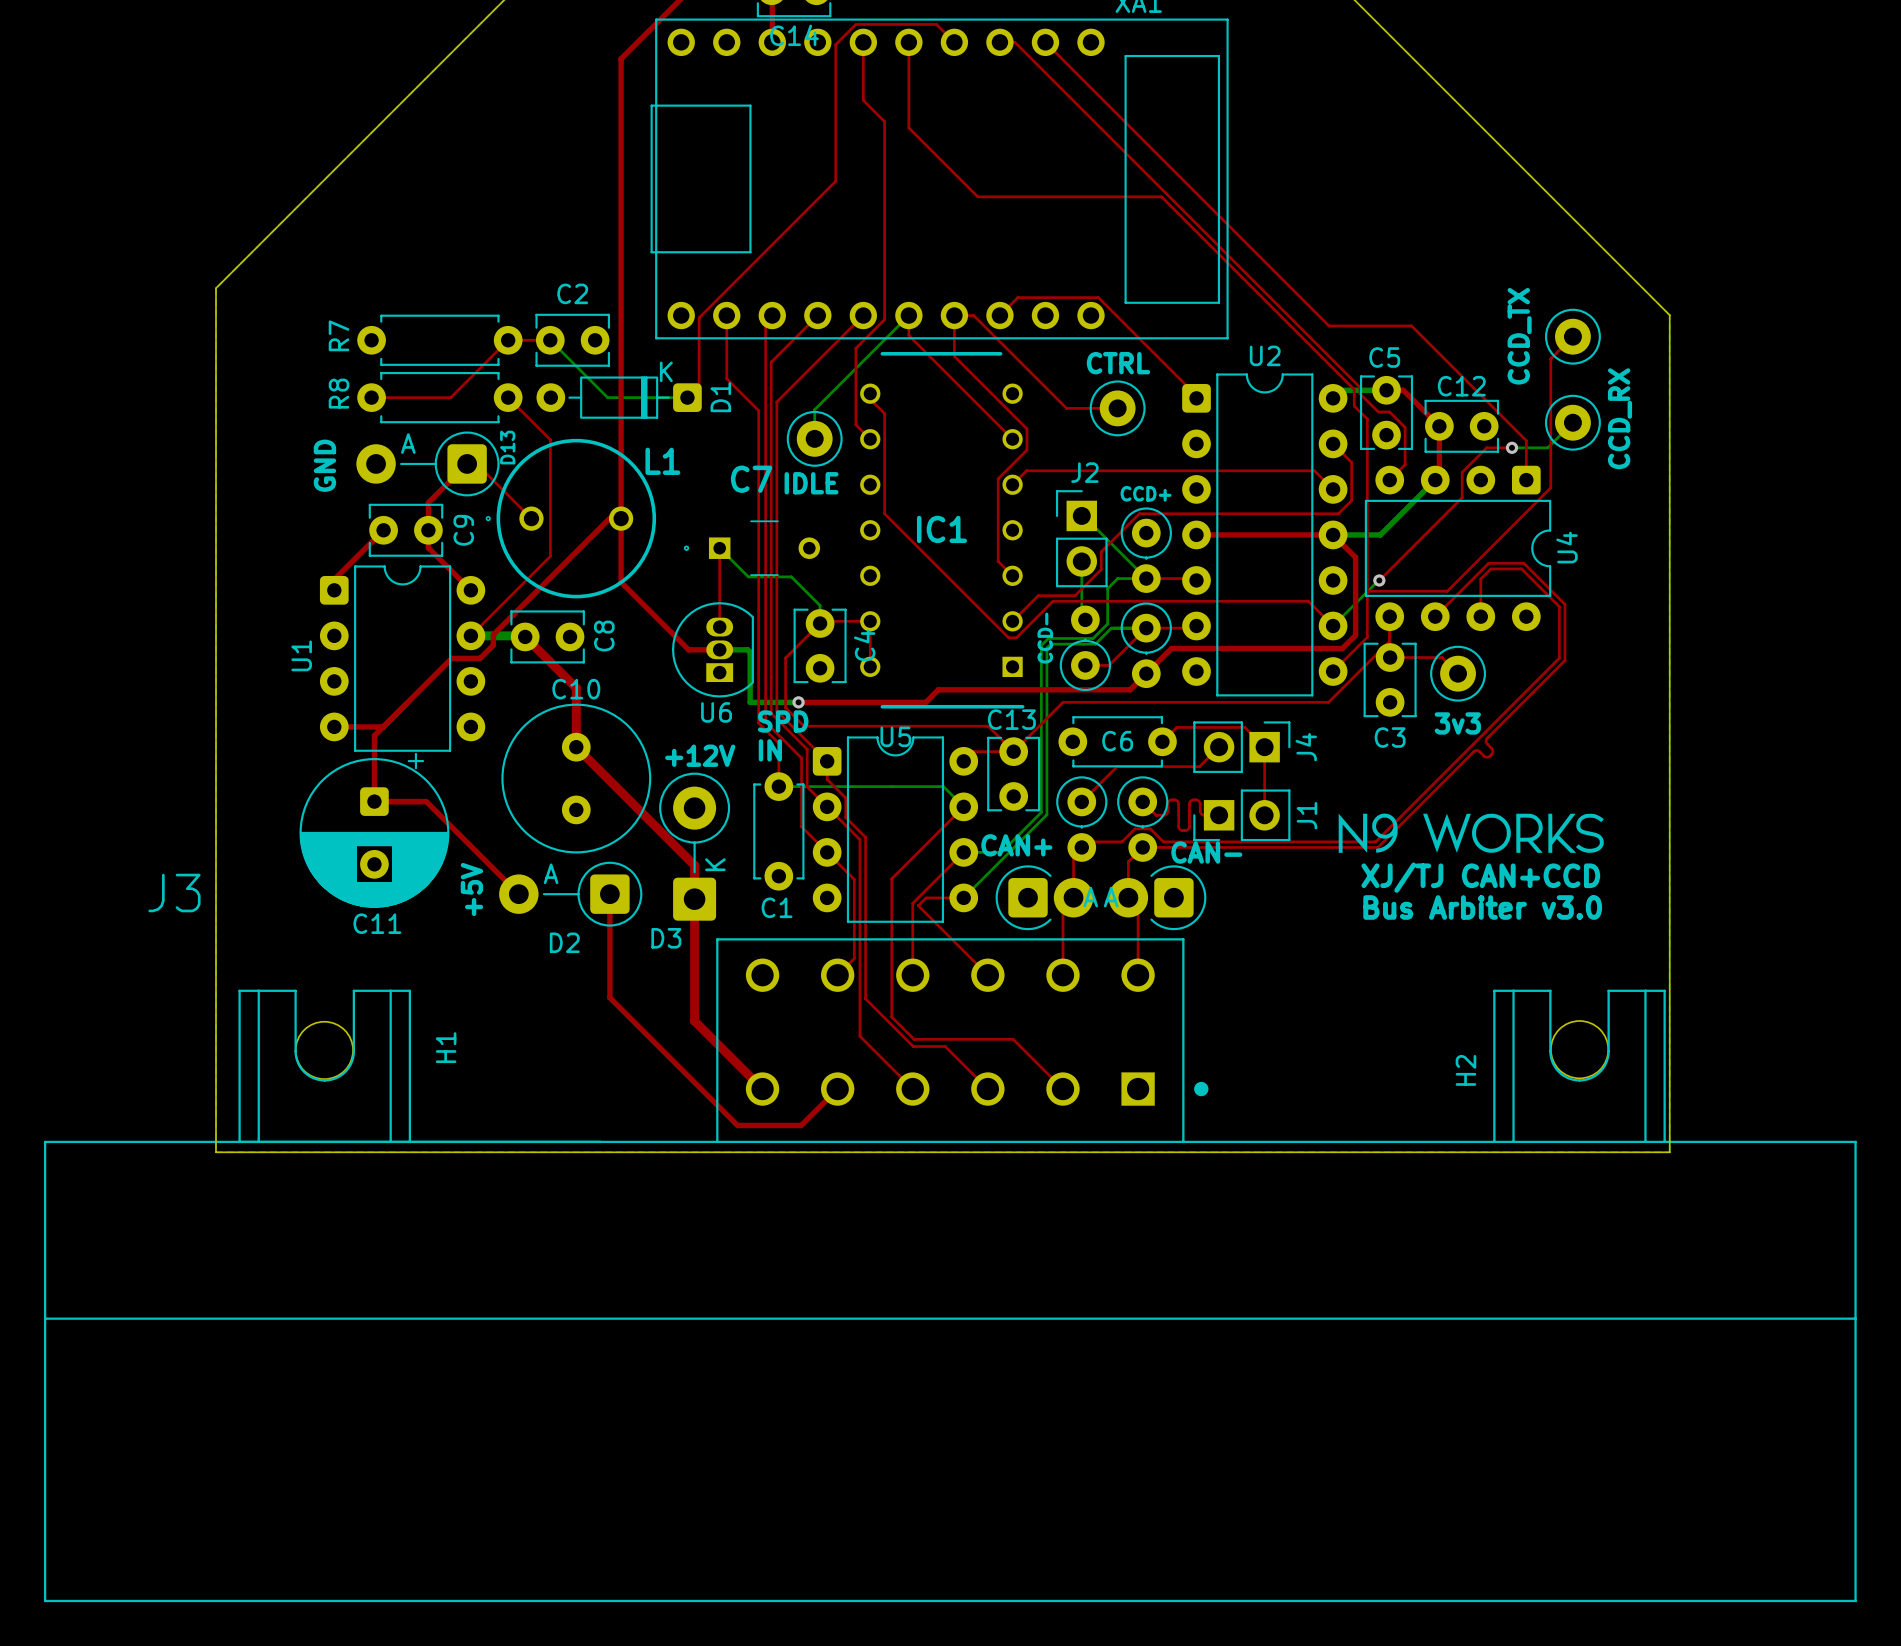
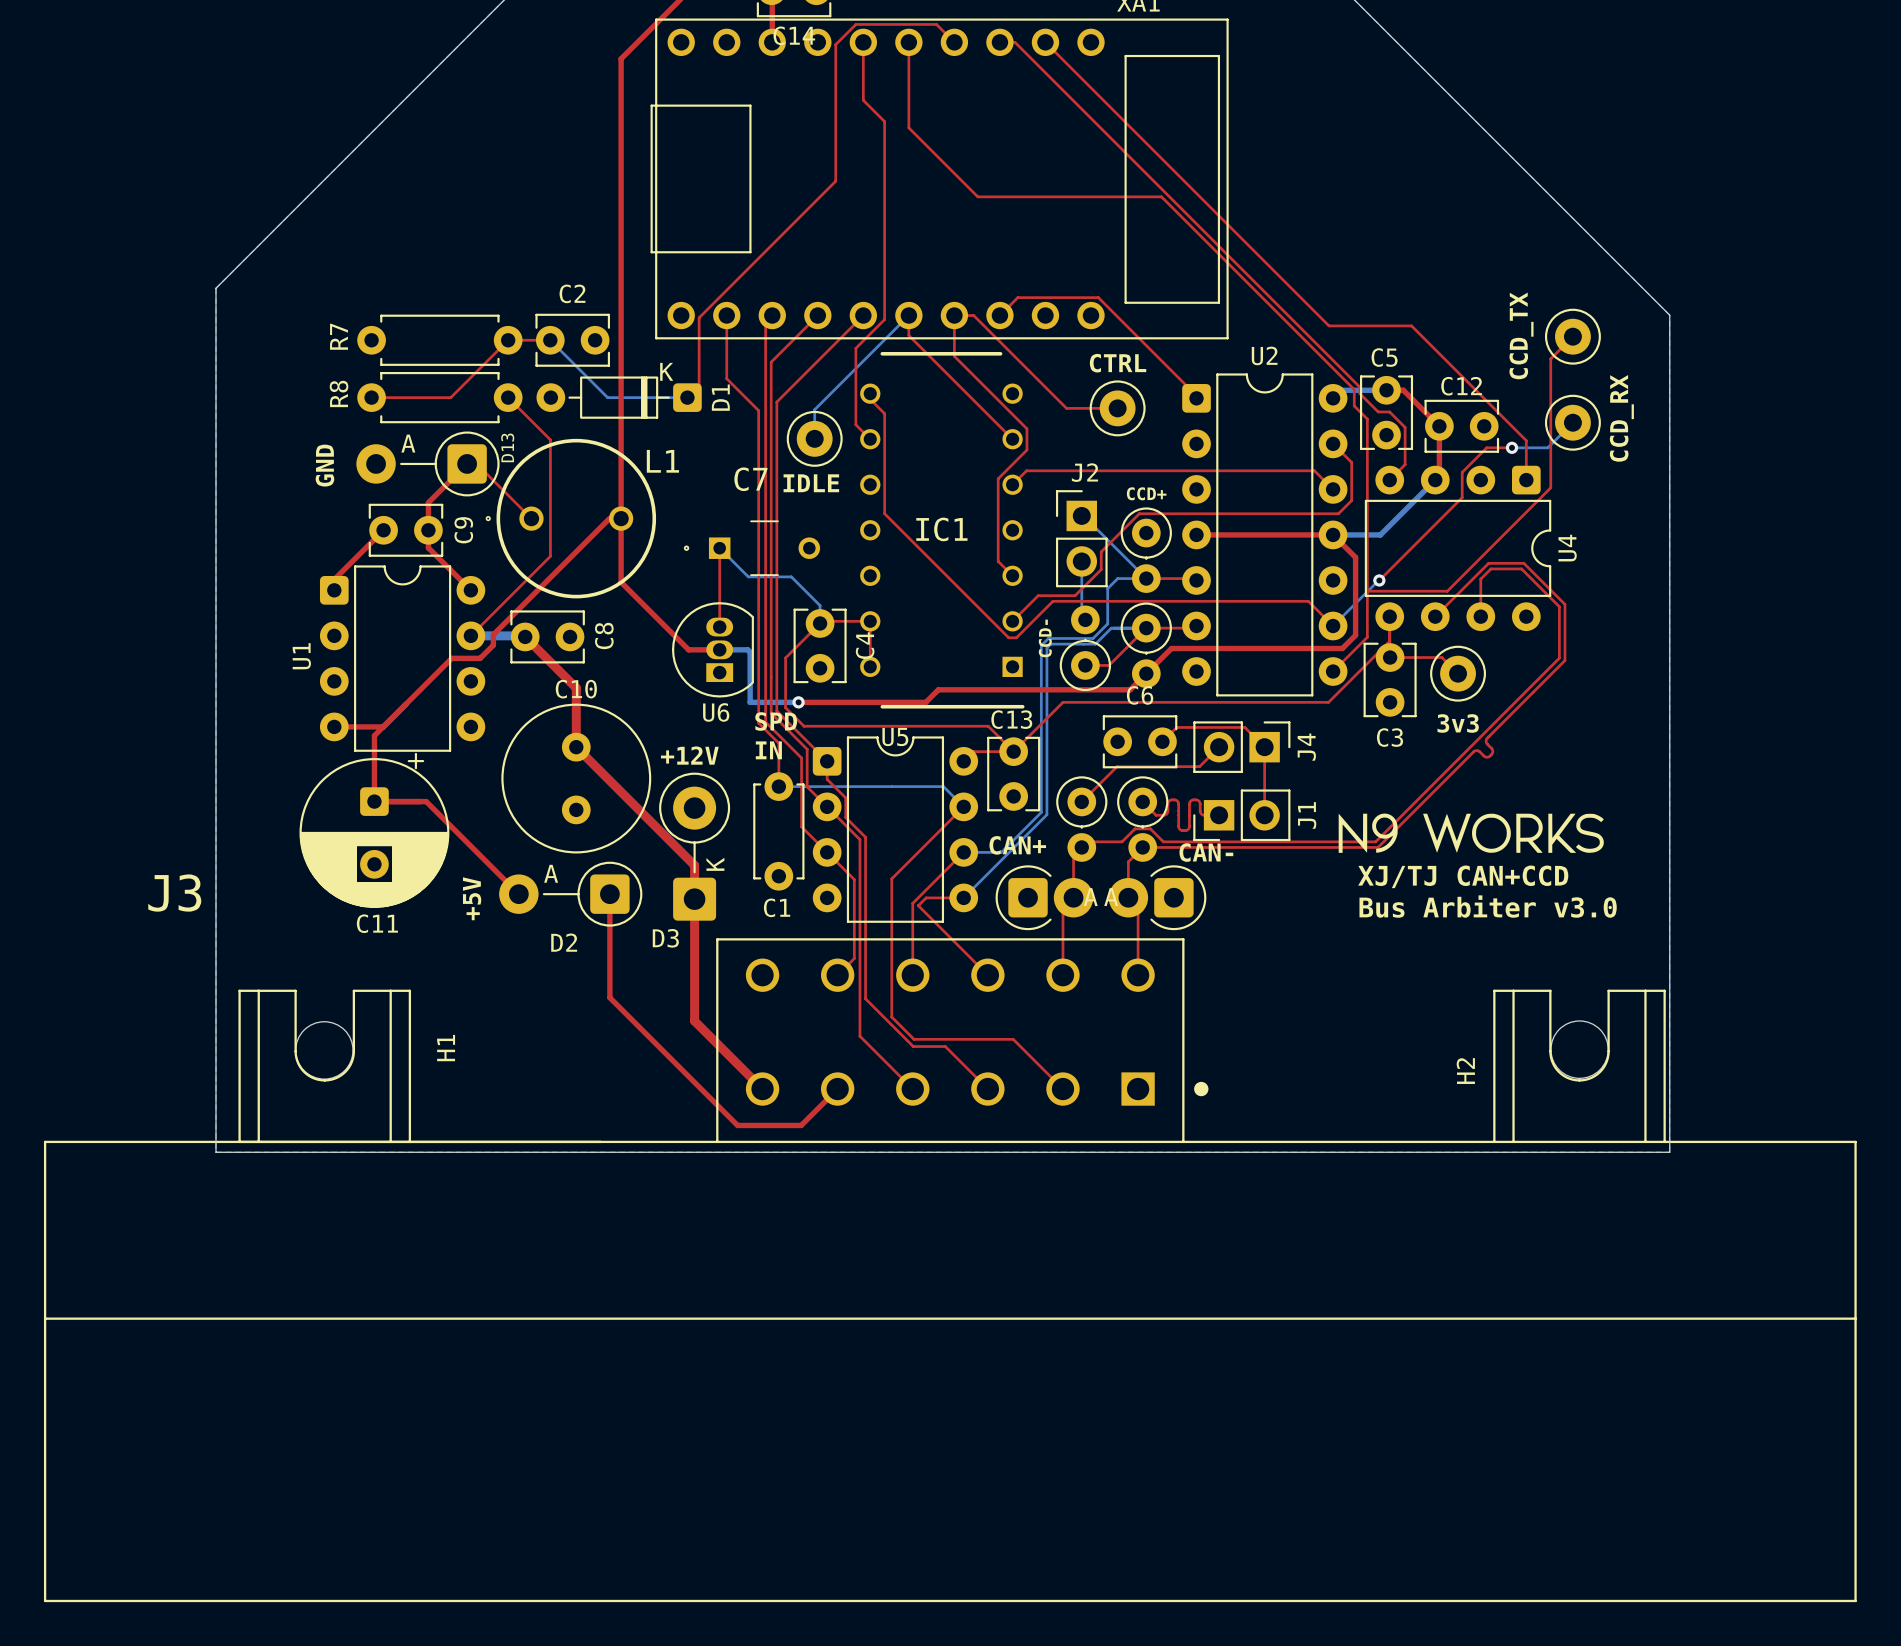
C6 footprint: [1058, 716, 1177, 768] -> [1102, 715, 1178, 769]
C6 name position: C6 (1117, 741) -> C6 (1140, 695)

